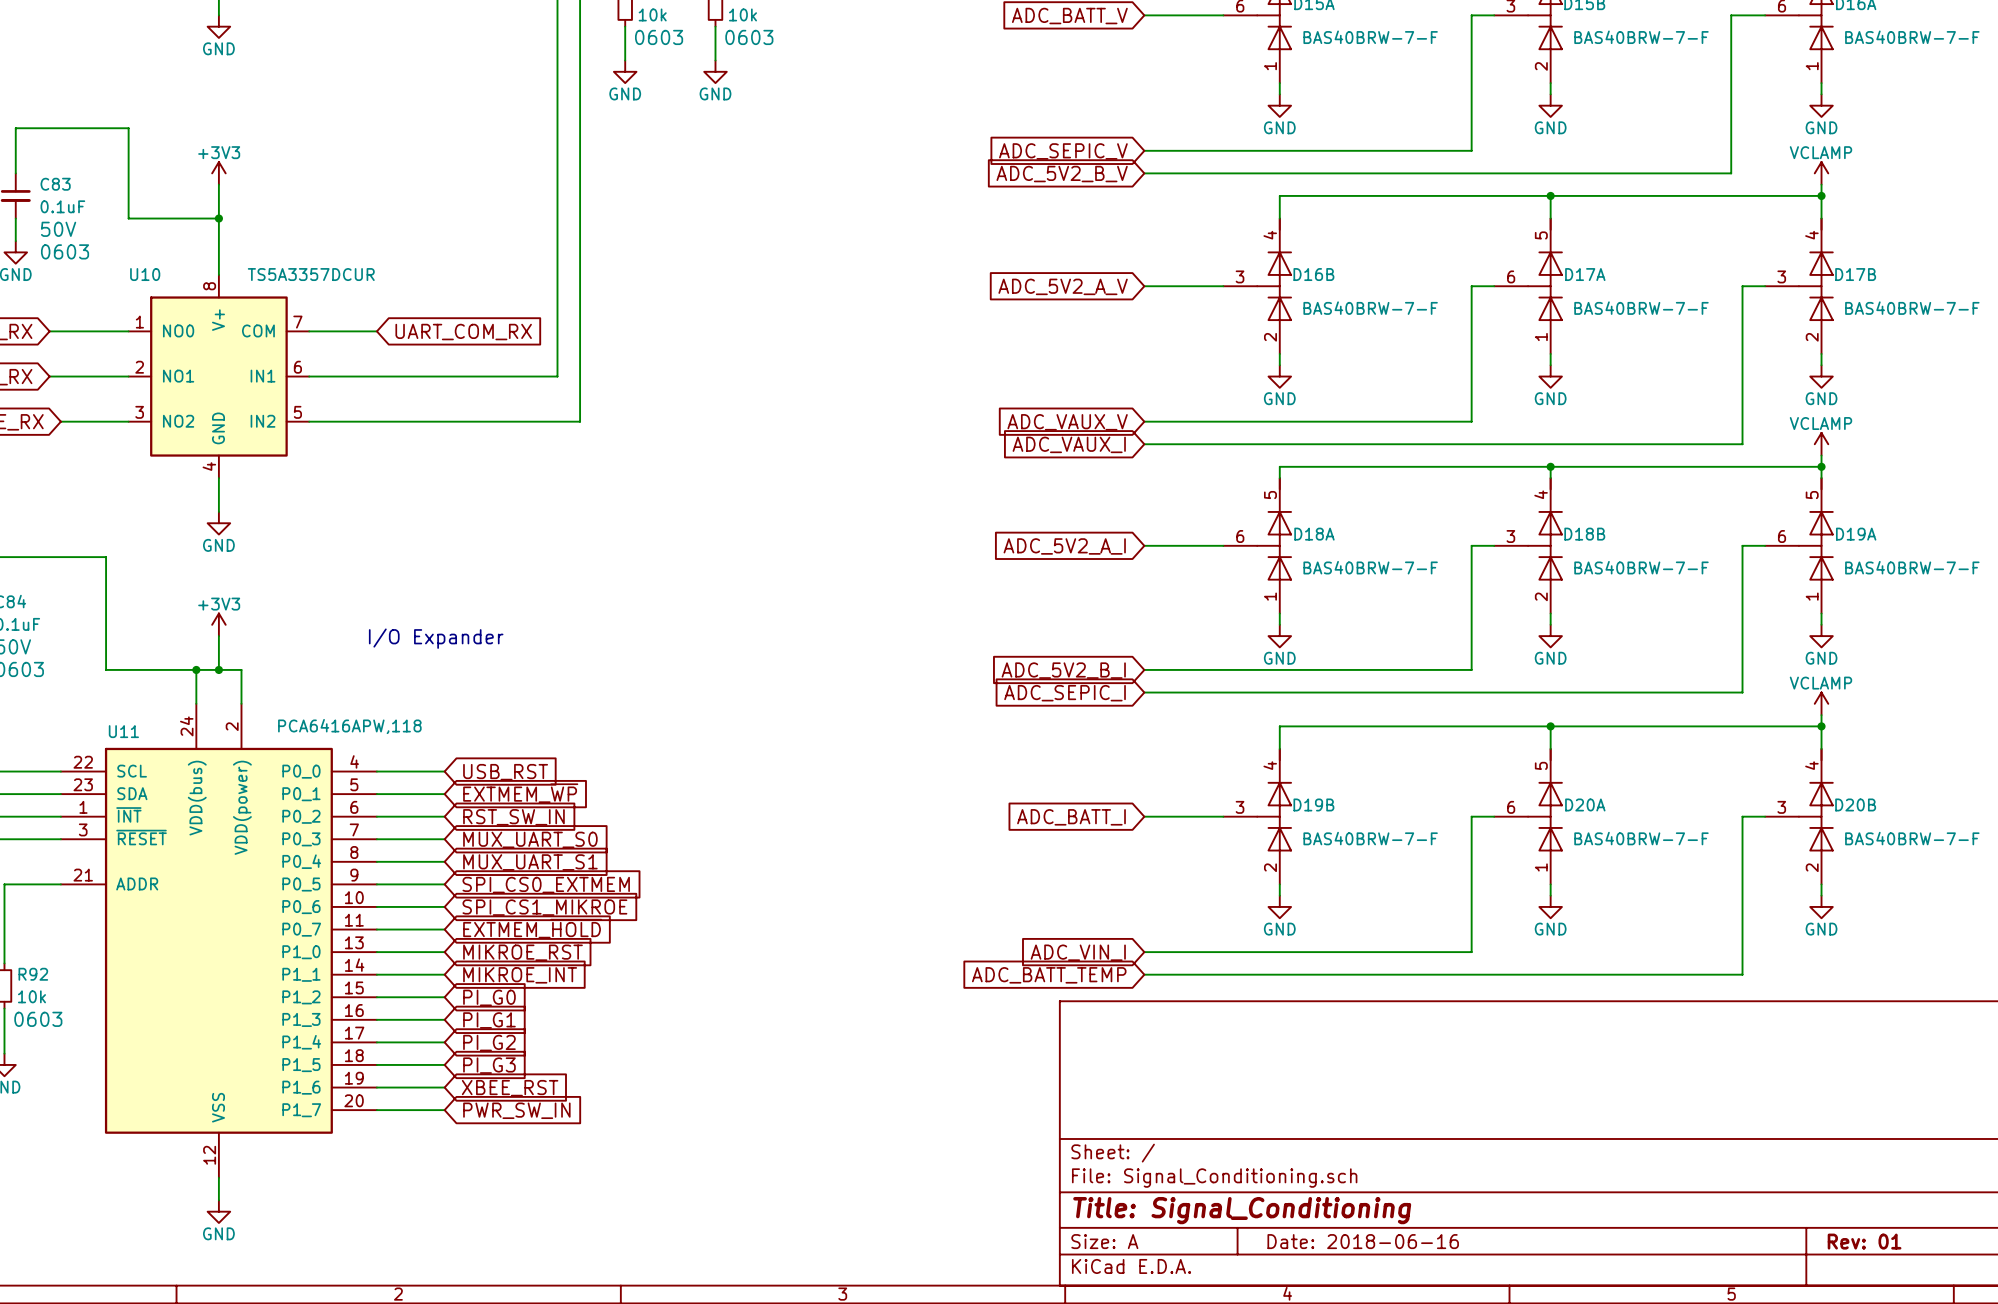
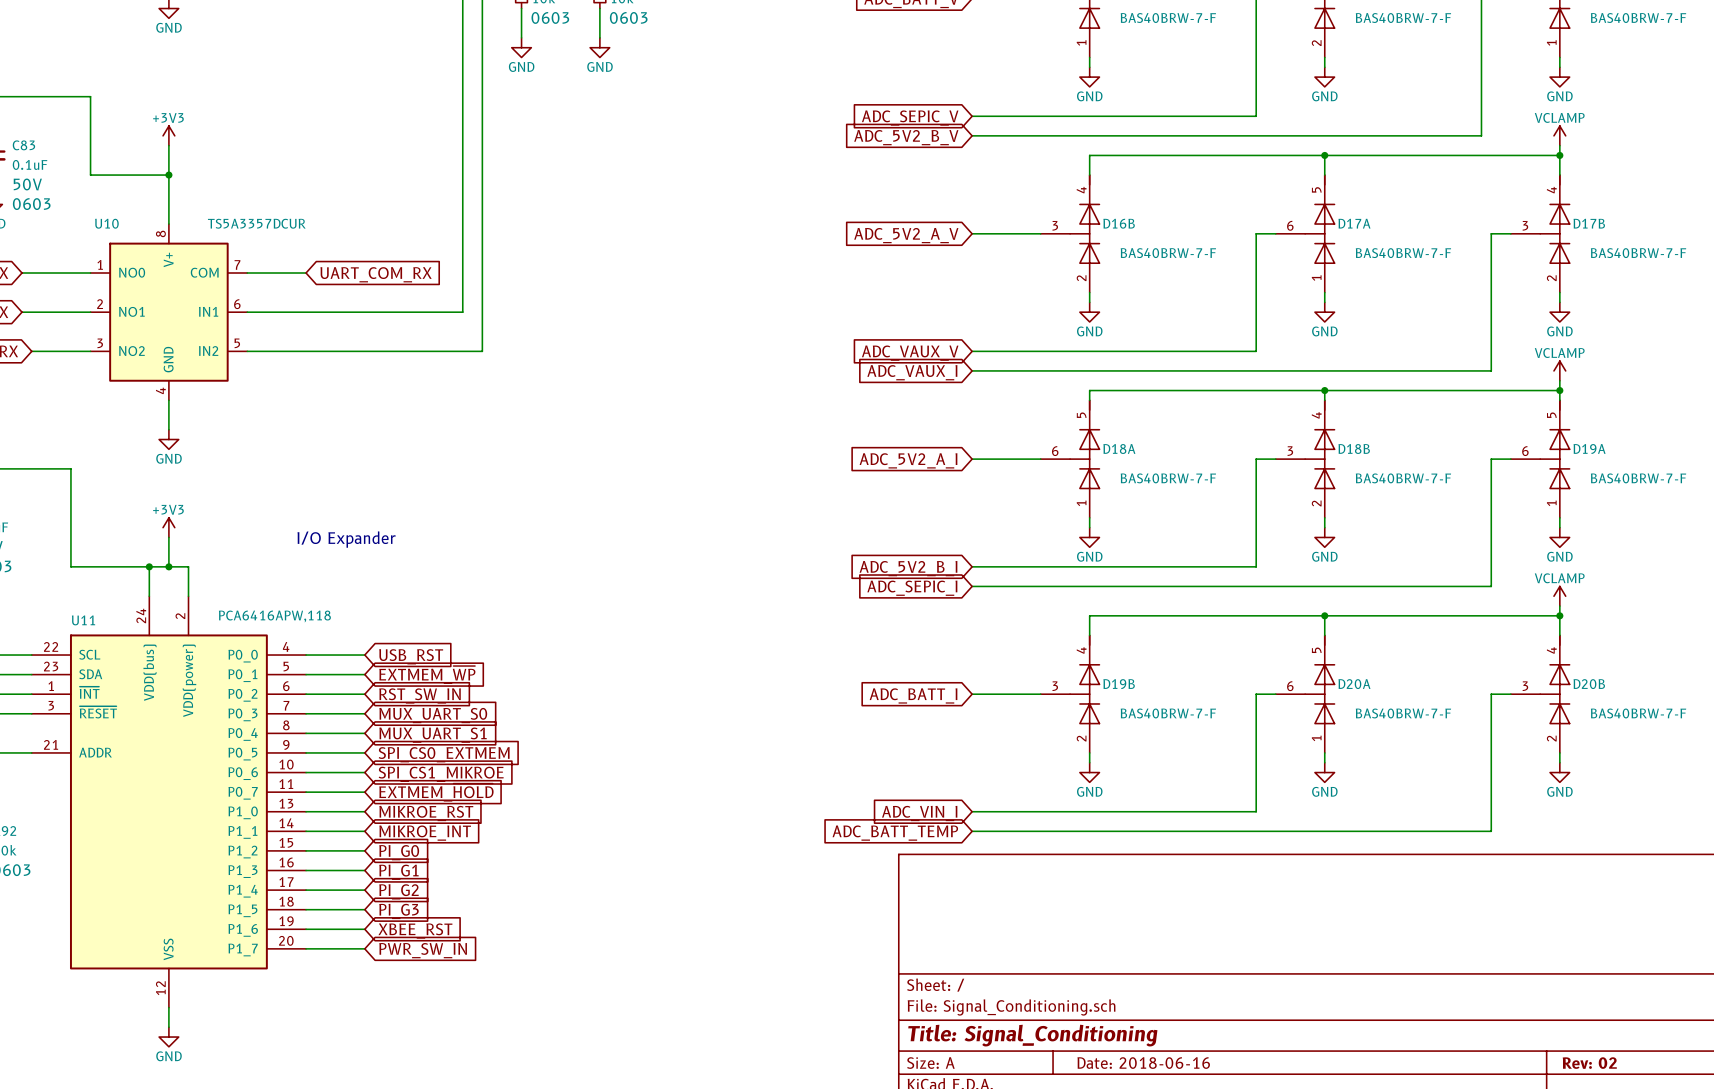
title block: Rev: 01 (1864, 1241) -> Rev: 02 (1589, 1063)

